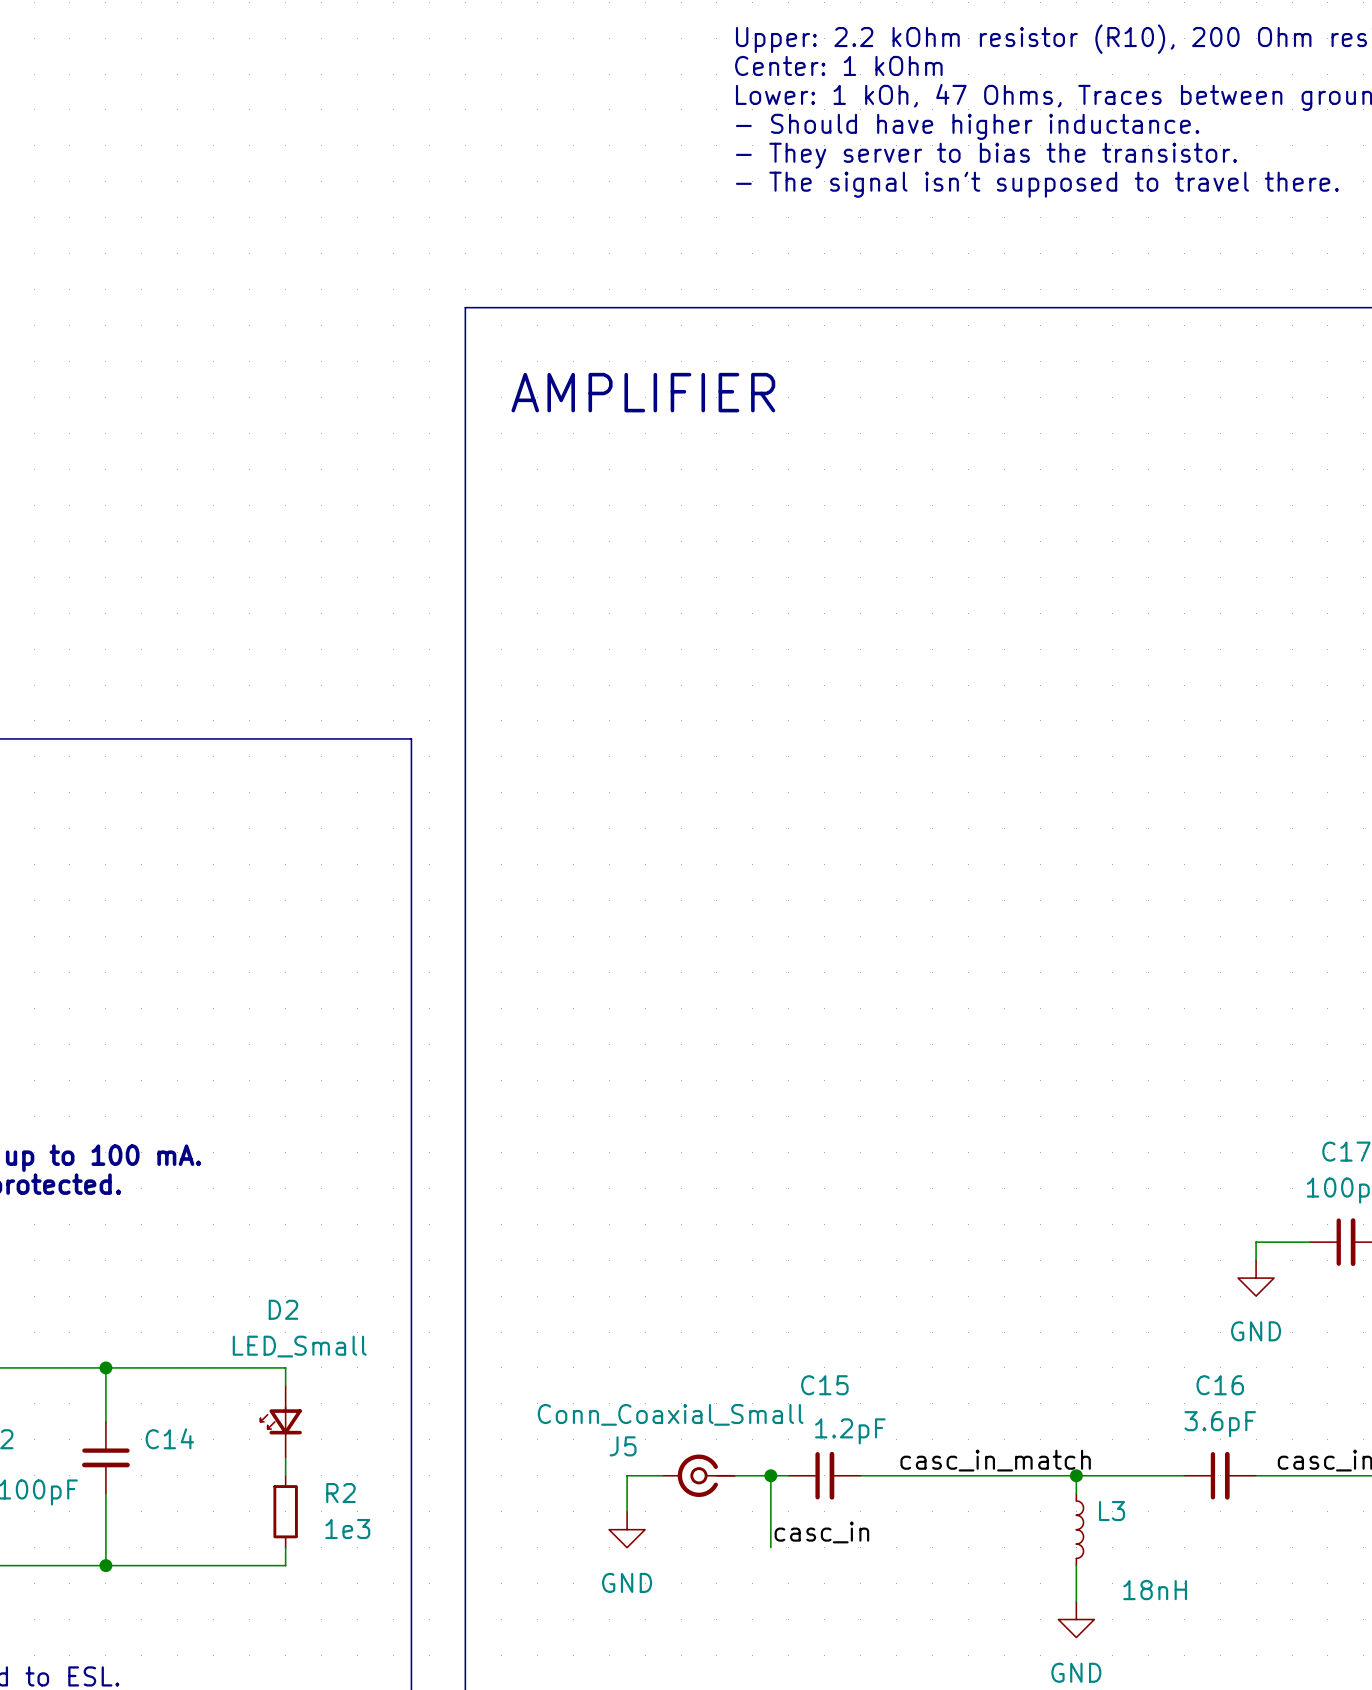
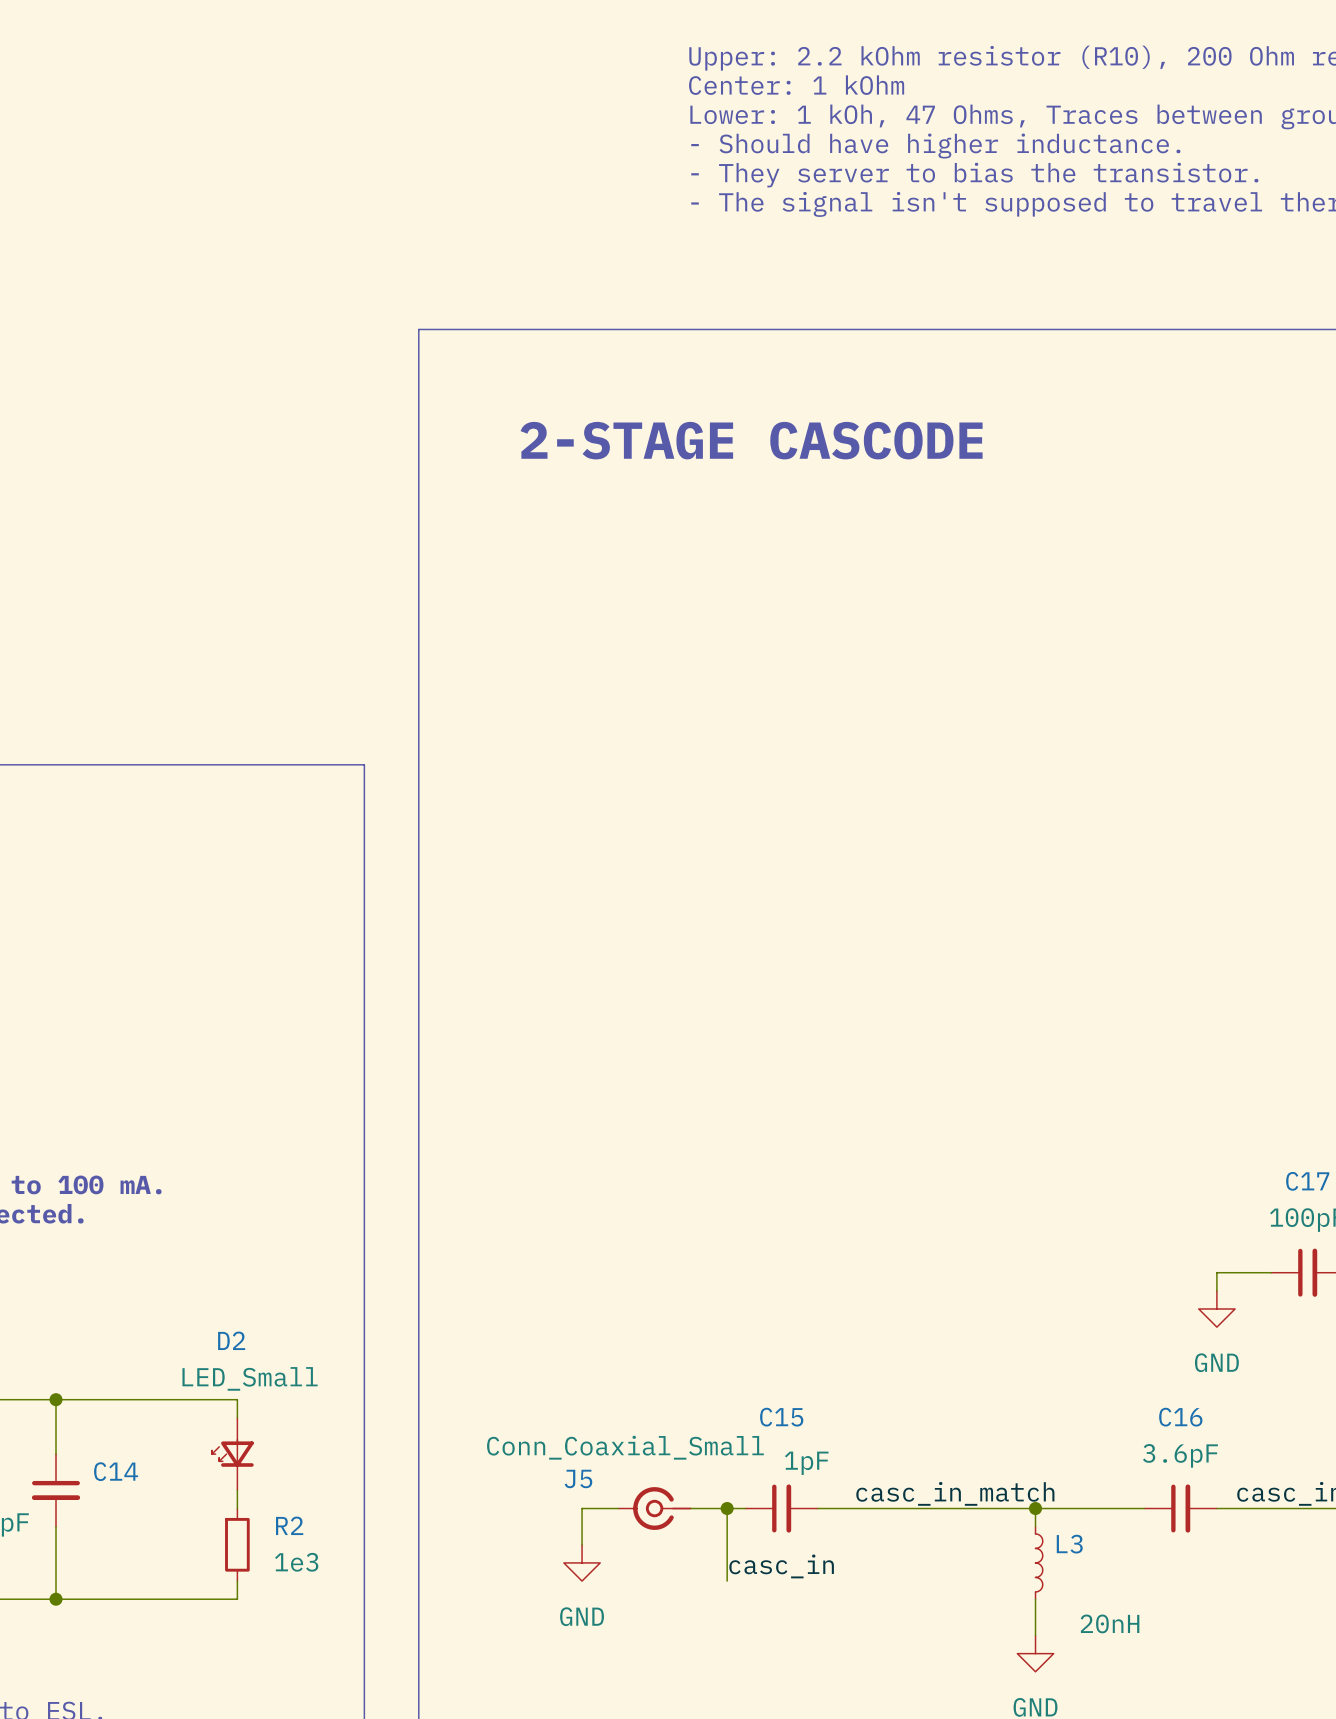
text: AMPLIFIER (643, 392) -> none
text: none -> 2-STAGE CASCODE (751, 440)
C15 value: 1.2pF (850, 1431) -> 1pF (806, 1463)
L3 value: 18nH (1155, 1590) -> 20nH (1110, 1623)

